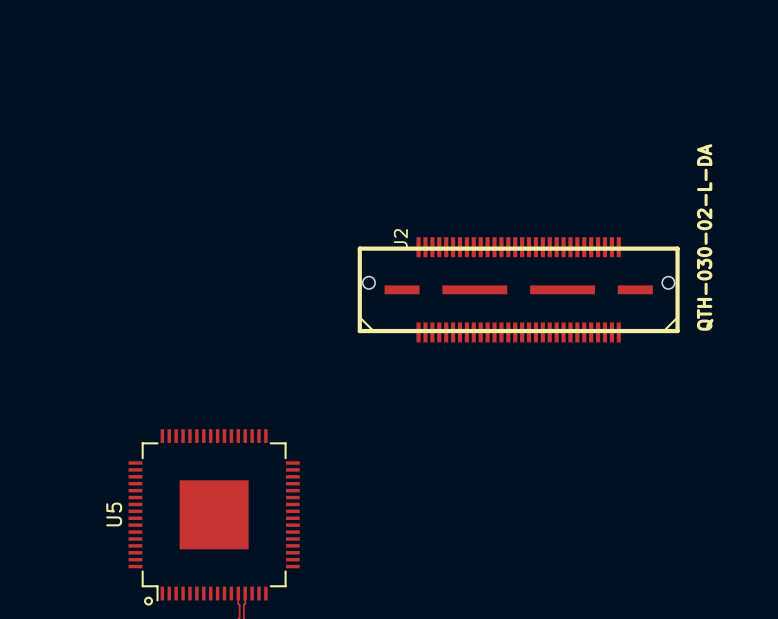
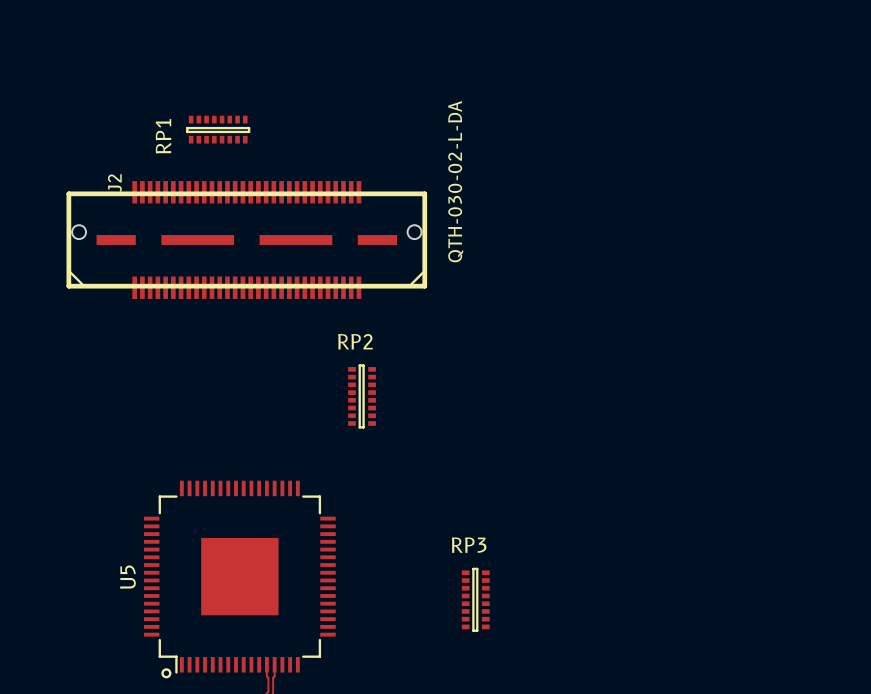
RP1: none -> (218, 129)
J2 position: (518, 289) -> (246, 240)
RP2: none -> (362, 396)
RP3: none -> (475, 599)

